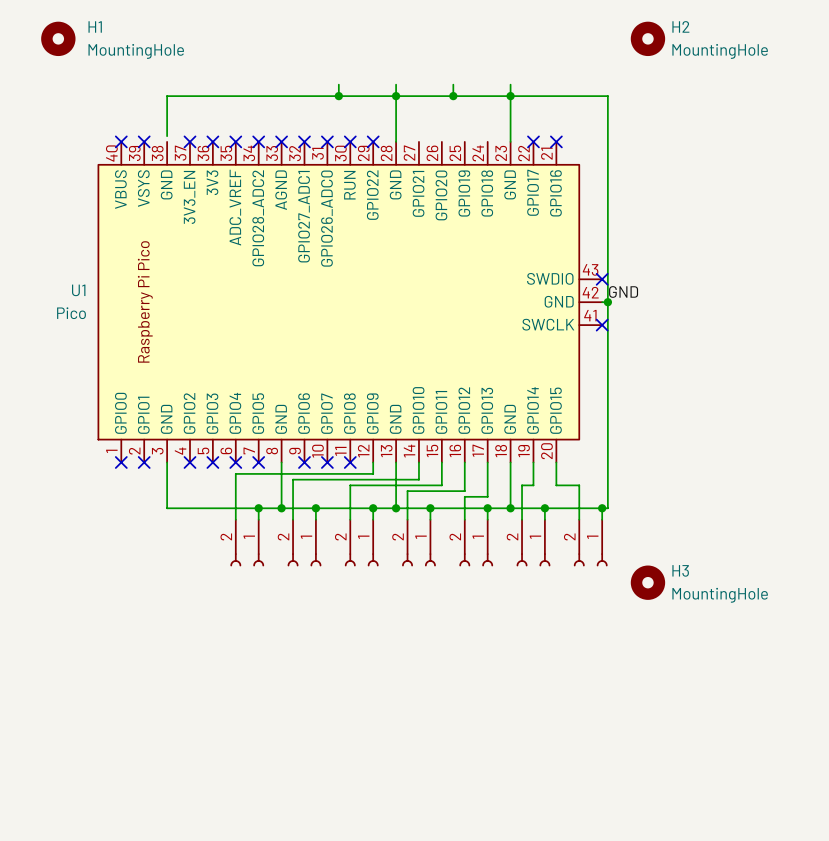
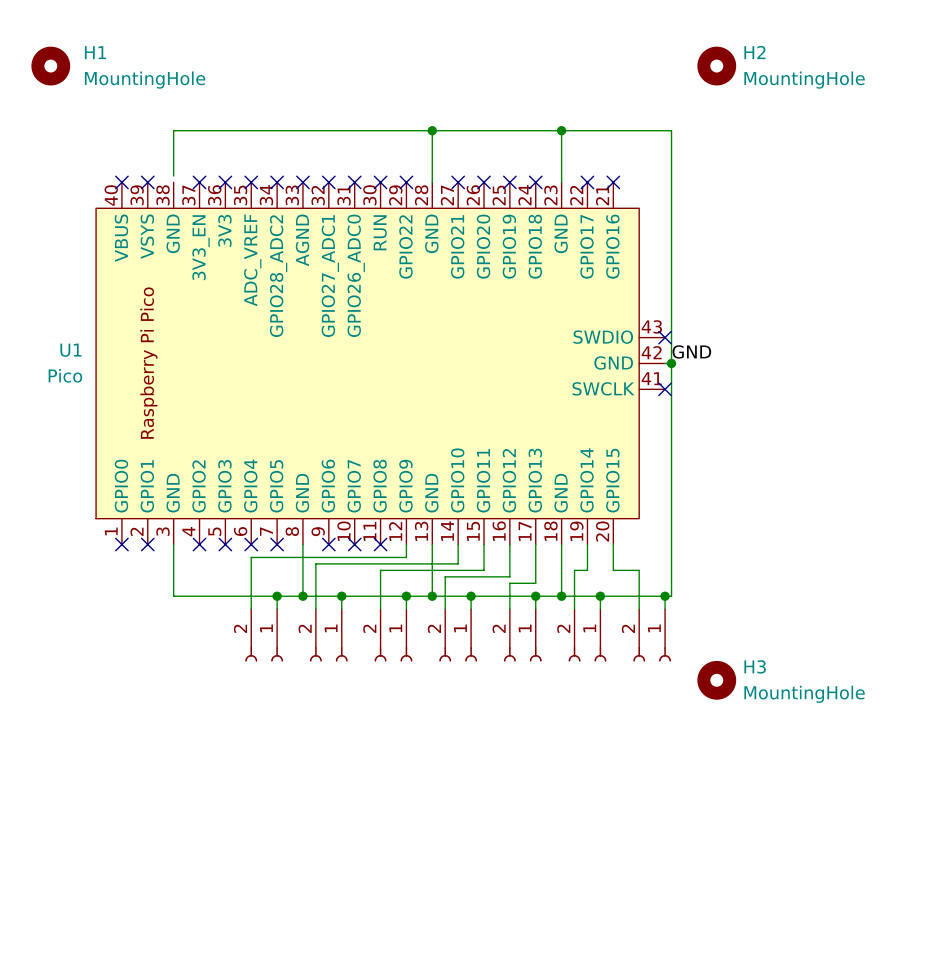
wire: (338, 84) (338, 96) -> none
wire: (396, 84) (396, 96) -> none
wire: (453, 84) (453, 96) -> none
wire: (510, 84) (510, 96) -> none
junction: (338, 96) -> none
junction: (453, 96) -> none
no-connect mark: none -> (458, 182)
no-connect mark: none -> (484, 182)
no-connect mark: none -> (509, 182)
no-connect mark: none -> (535, 182)

